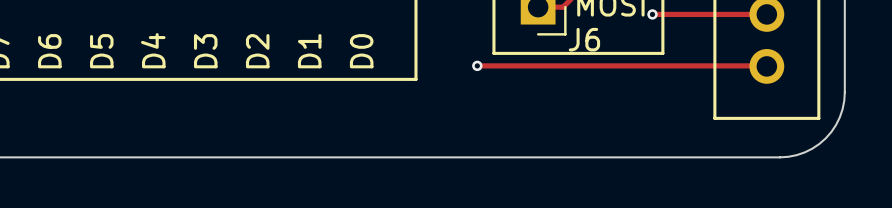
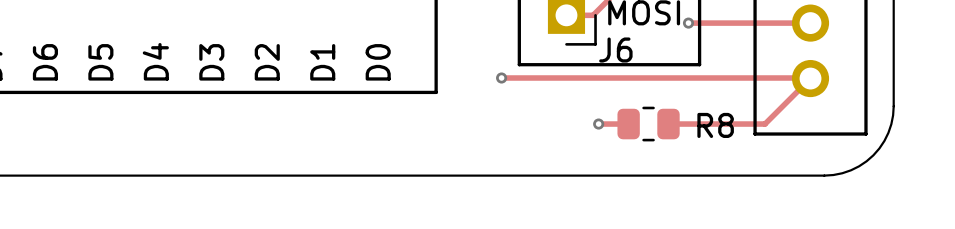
track: none -> (810, 78) (765, 124) (668, 124)
track: none -> (598, 124) (628, 124)
via: none -> (598, 124)
R8: none -> (648, 124)

